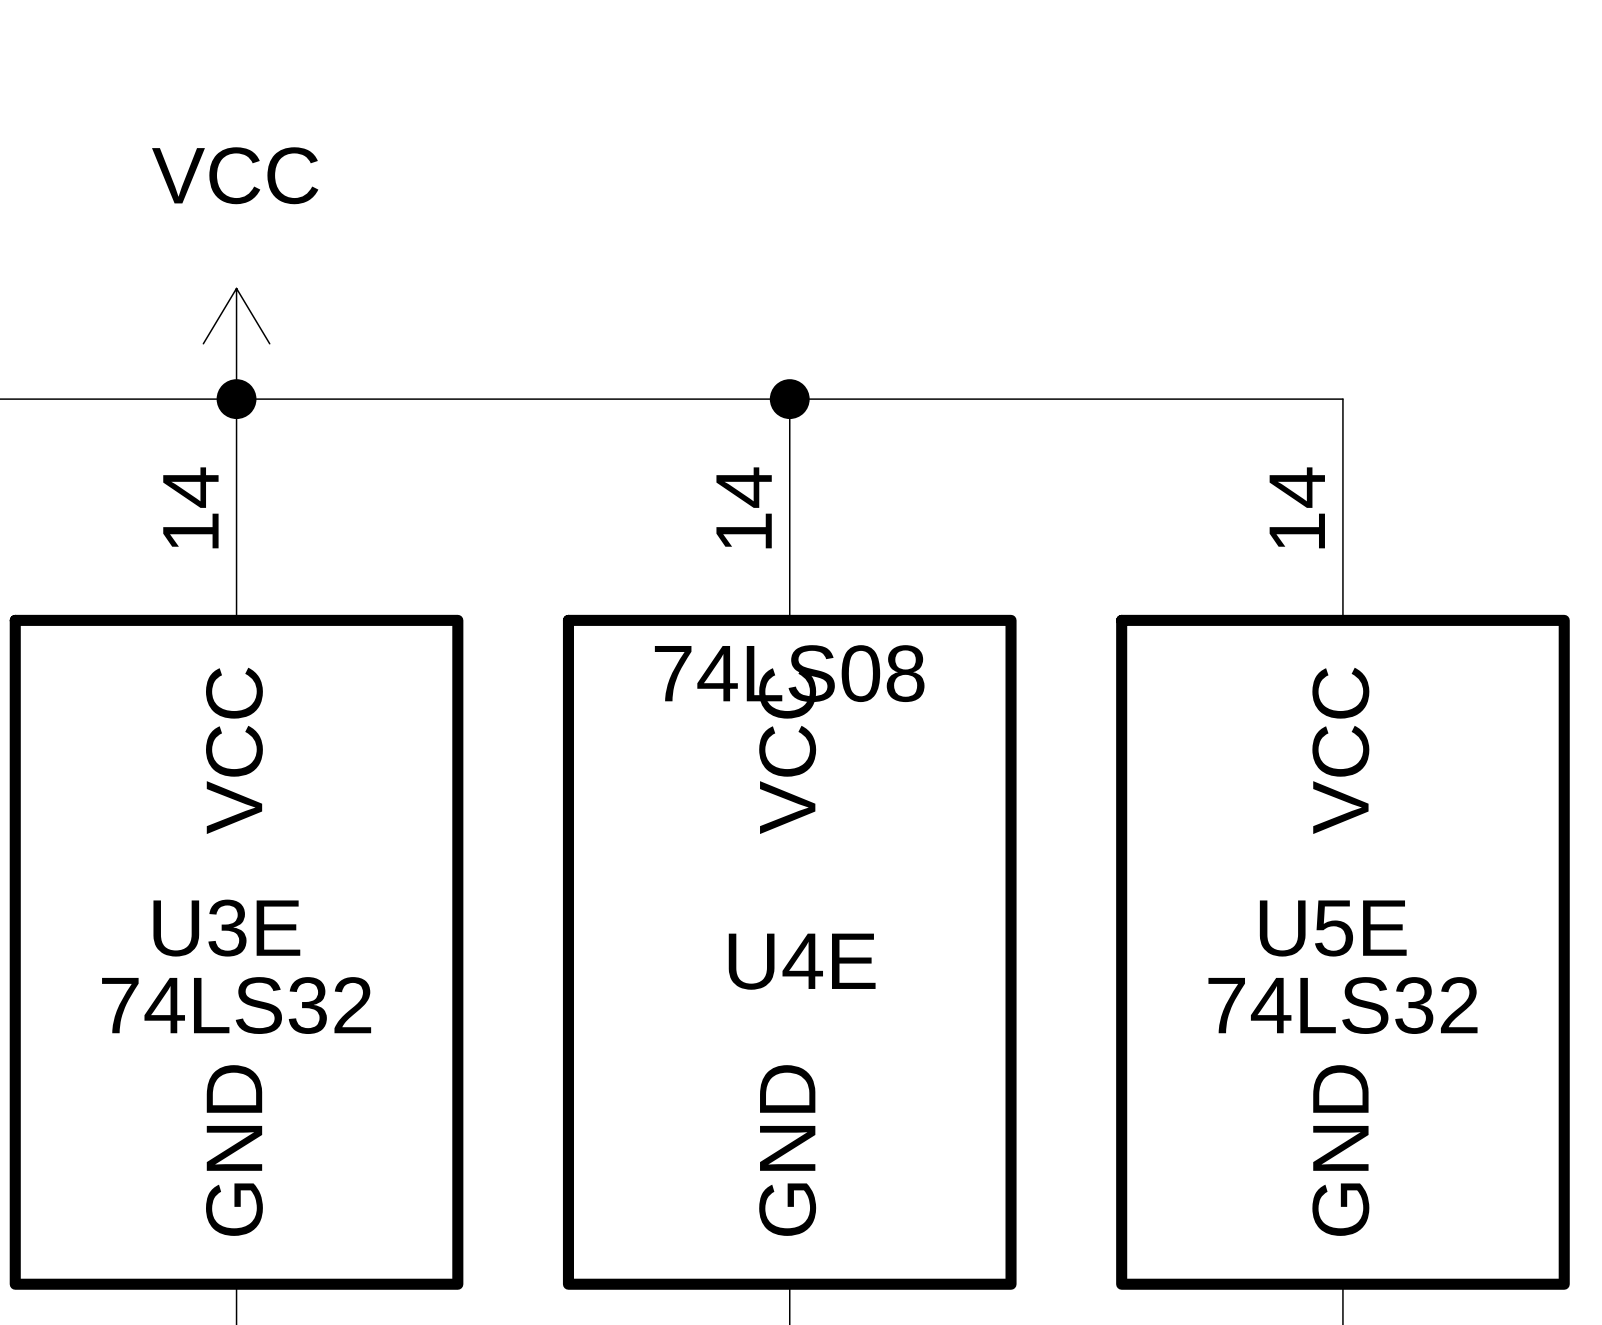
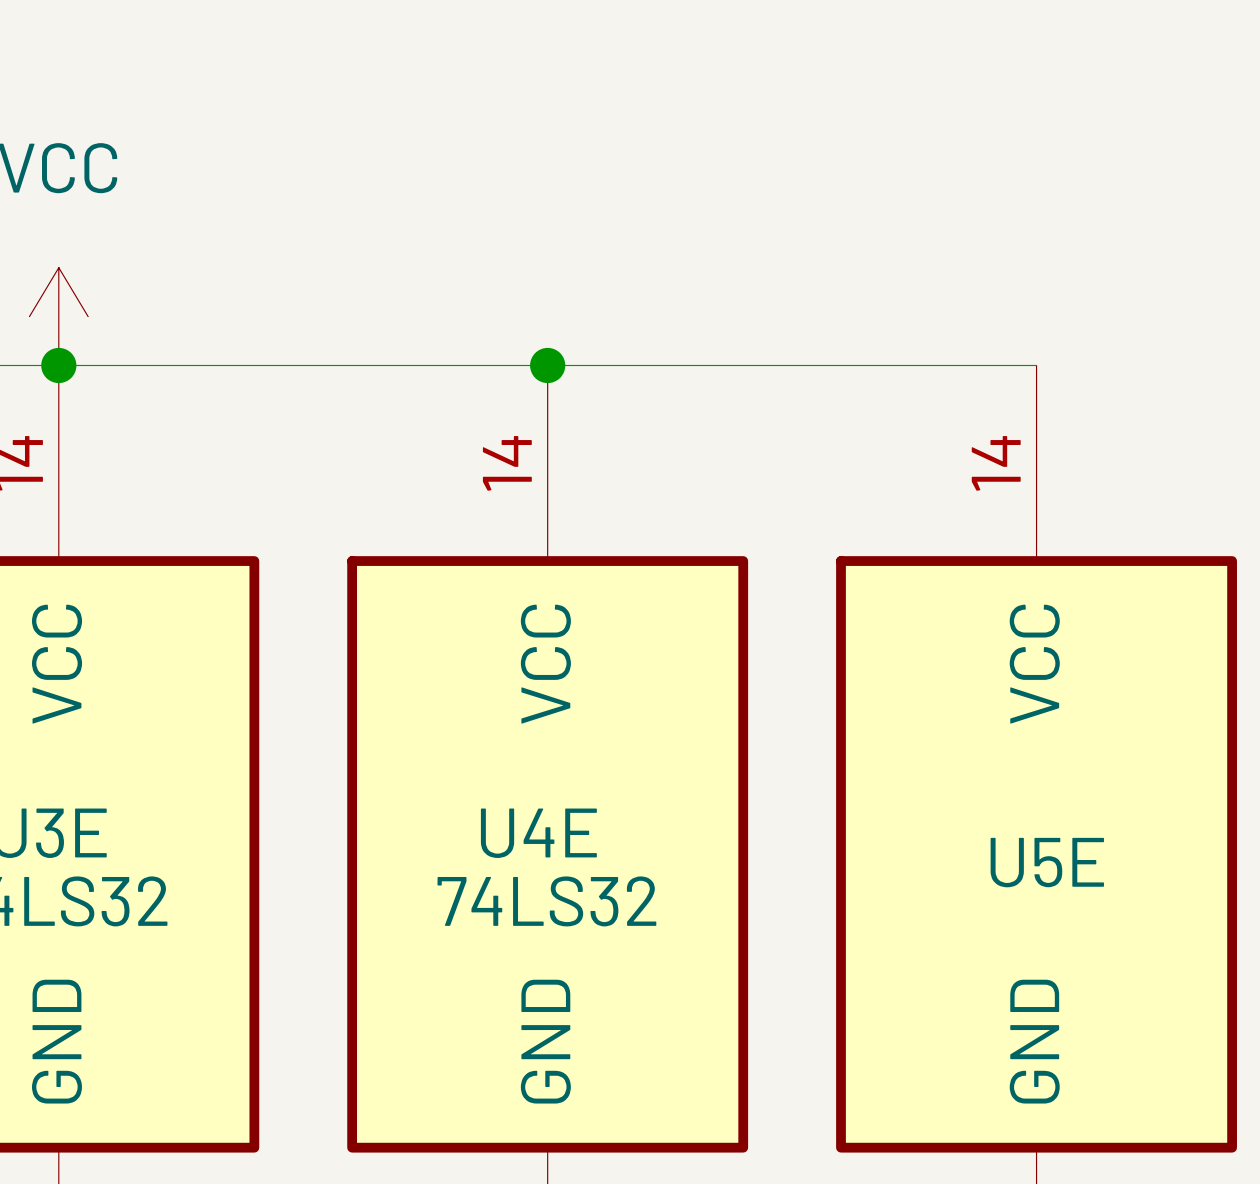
U4E value: 74LS08 (789, 673) -> 74LS32 (546, 901)
U5E name position: U5E (1333, 928) -> U5E (1047, 862)
U4E name position: U4E (802, 961) -> U4E (538, 833)
U5E value: 74LS32 (1342, 1005) -> none

